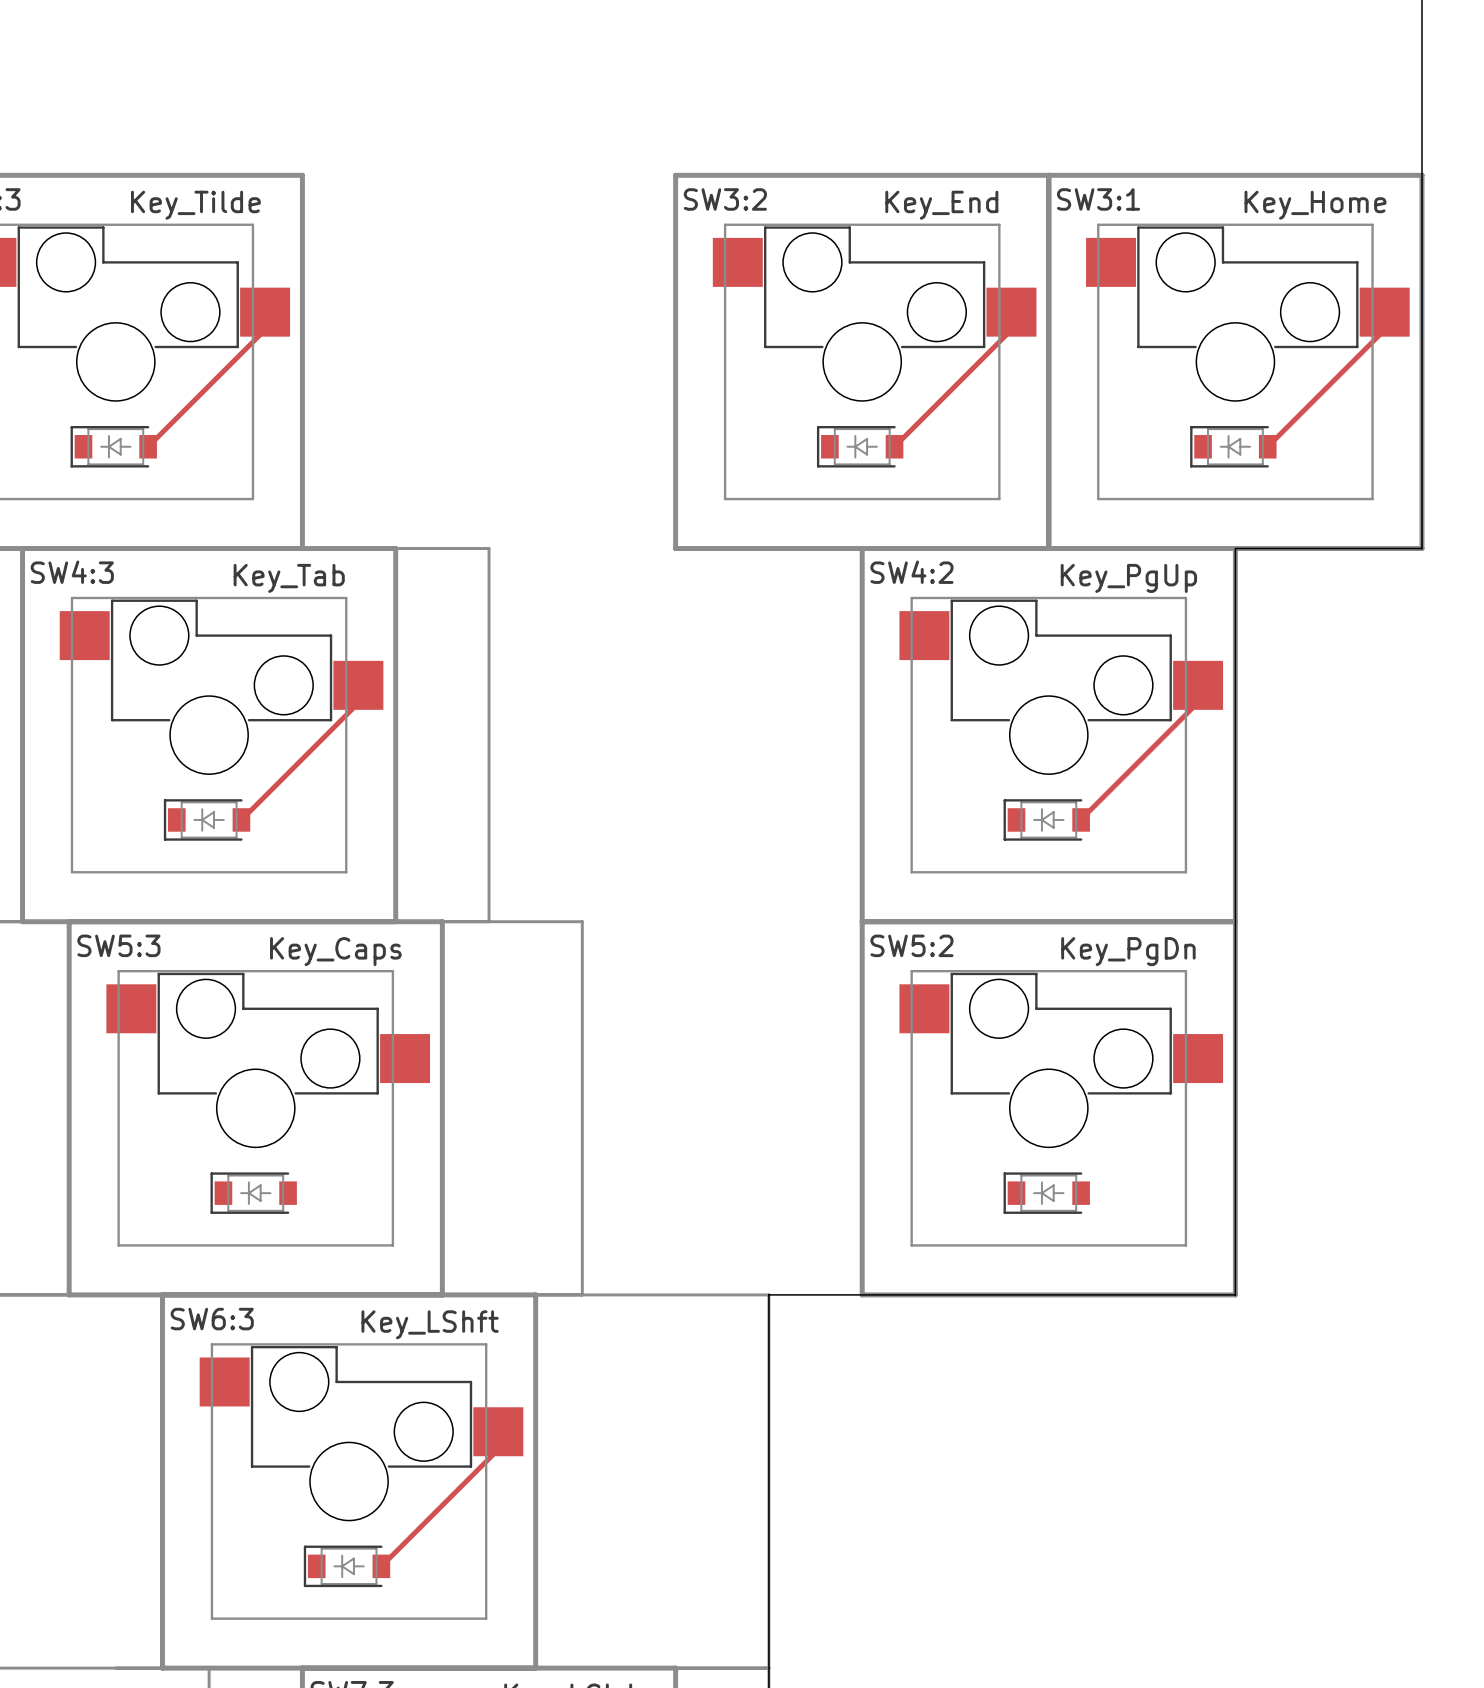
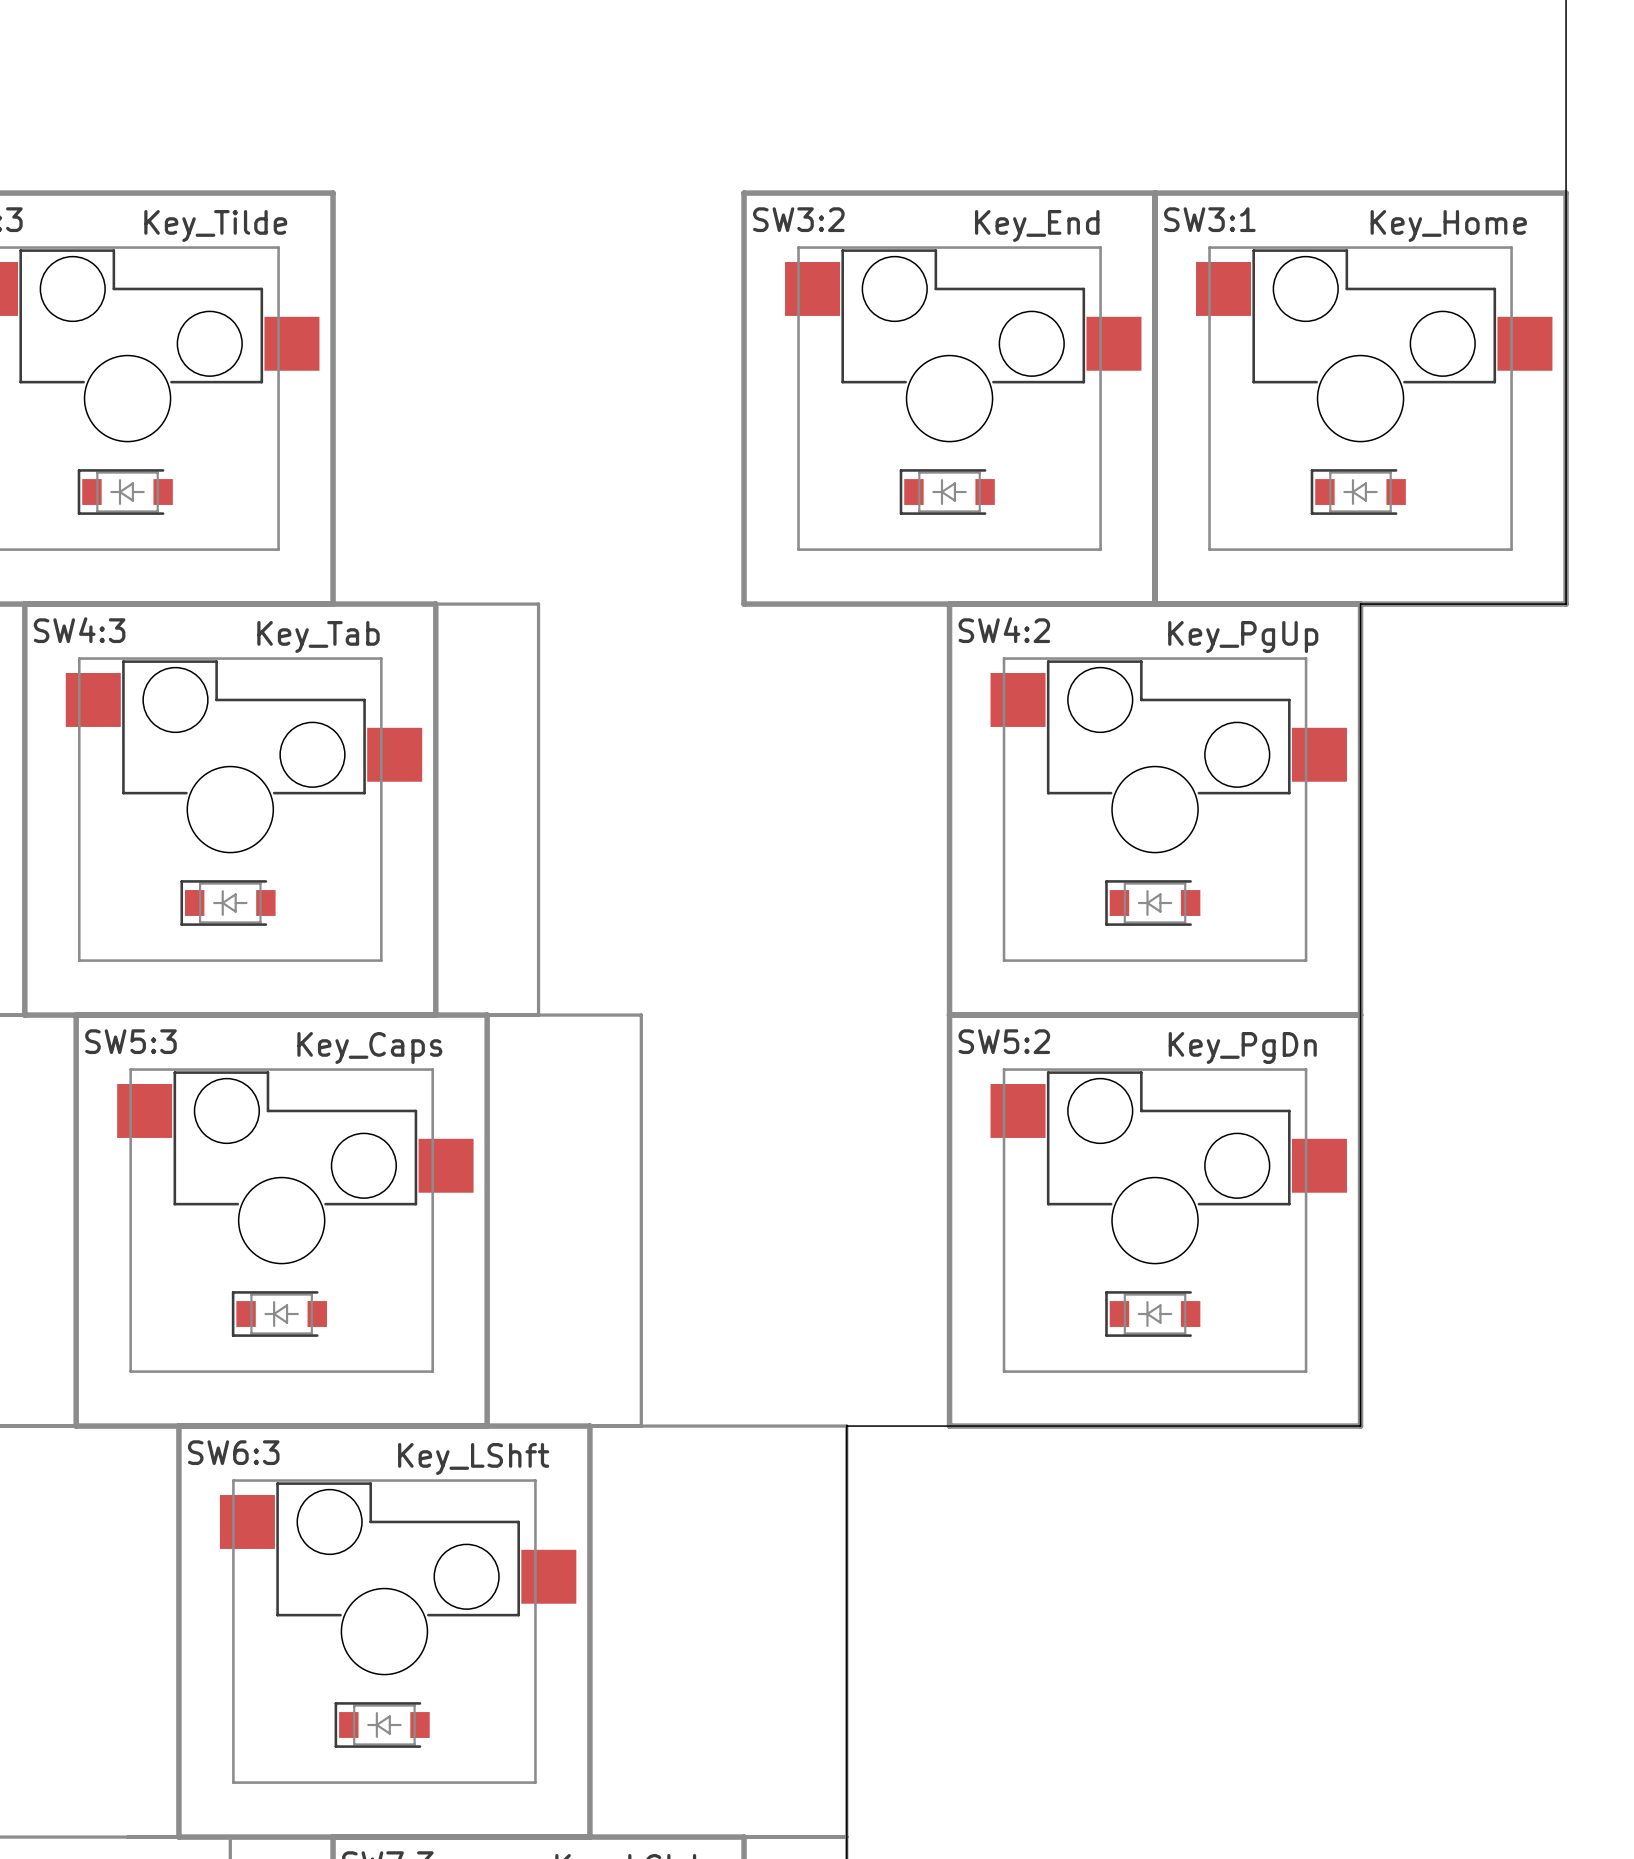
top track: (265, 312) (265, 329) (148, 446) -> none
top track: (1011, 312) (1011, 329) (894, 446) -> none
top track: (1384, 312) (1384, 329) (1267, 446) -> none
top track: (358, 685) (358, 702) (241, 819) -> none
top track: (1198, 685) (1198, 702) (1081, 819) -> none
top track: (498, 1431) (498, 1449) (381, 1566) -> none

